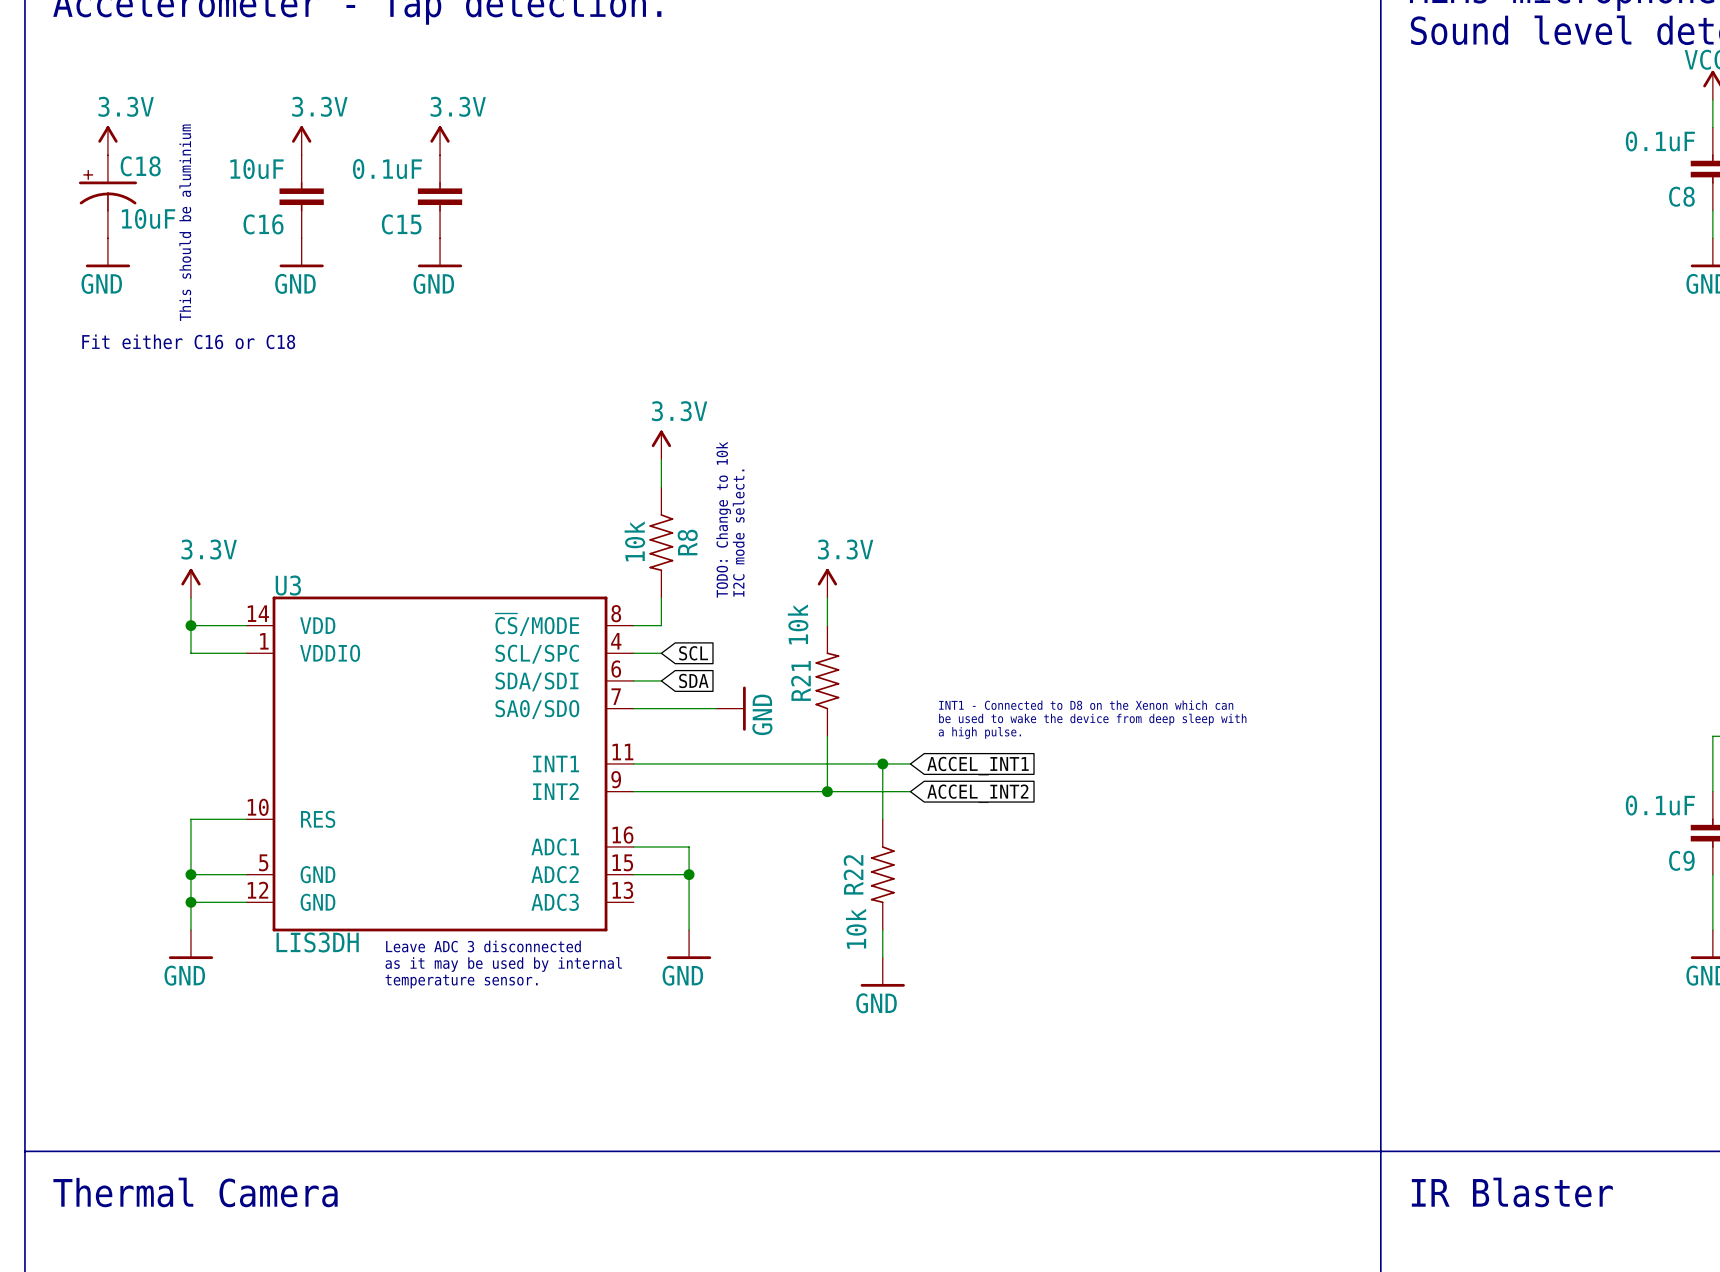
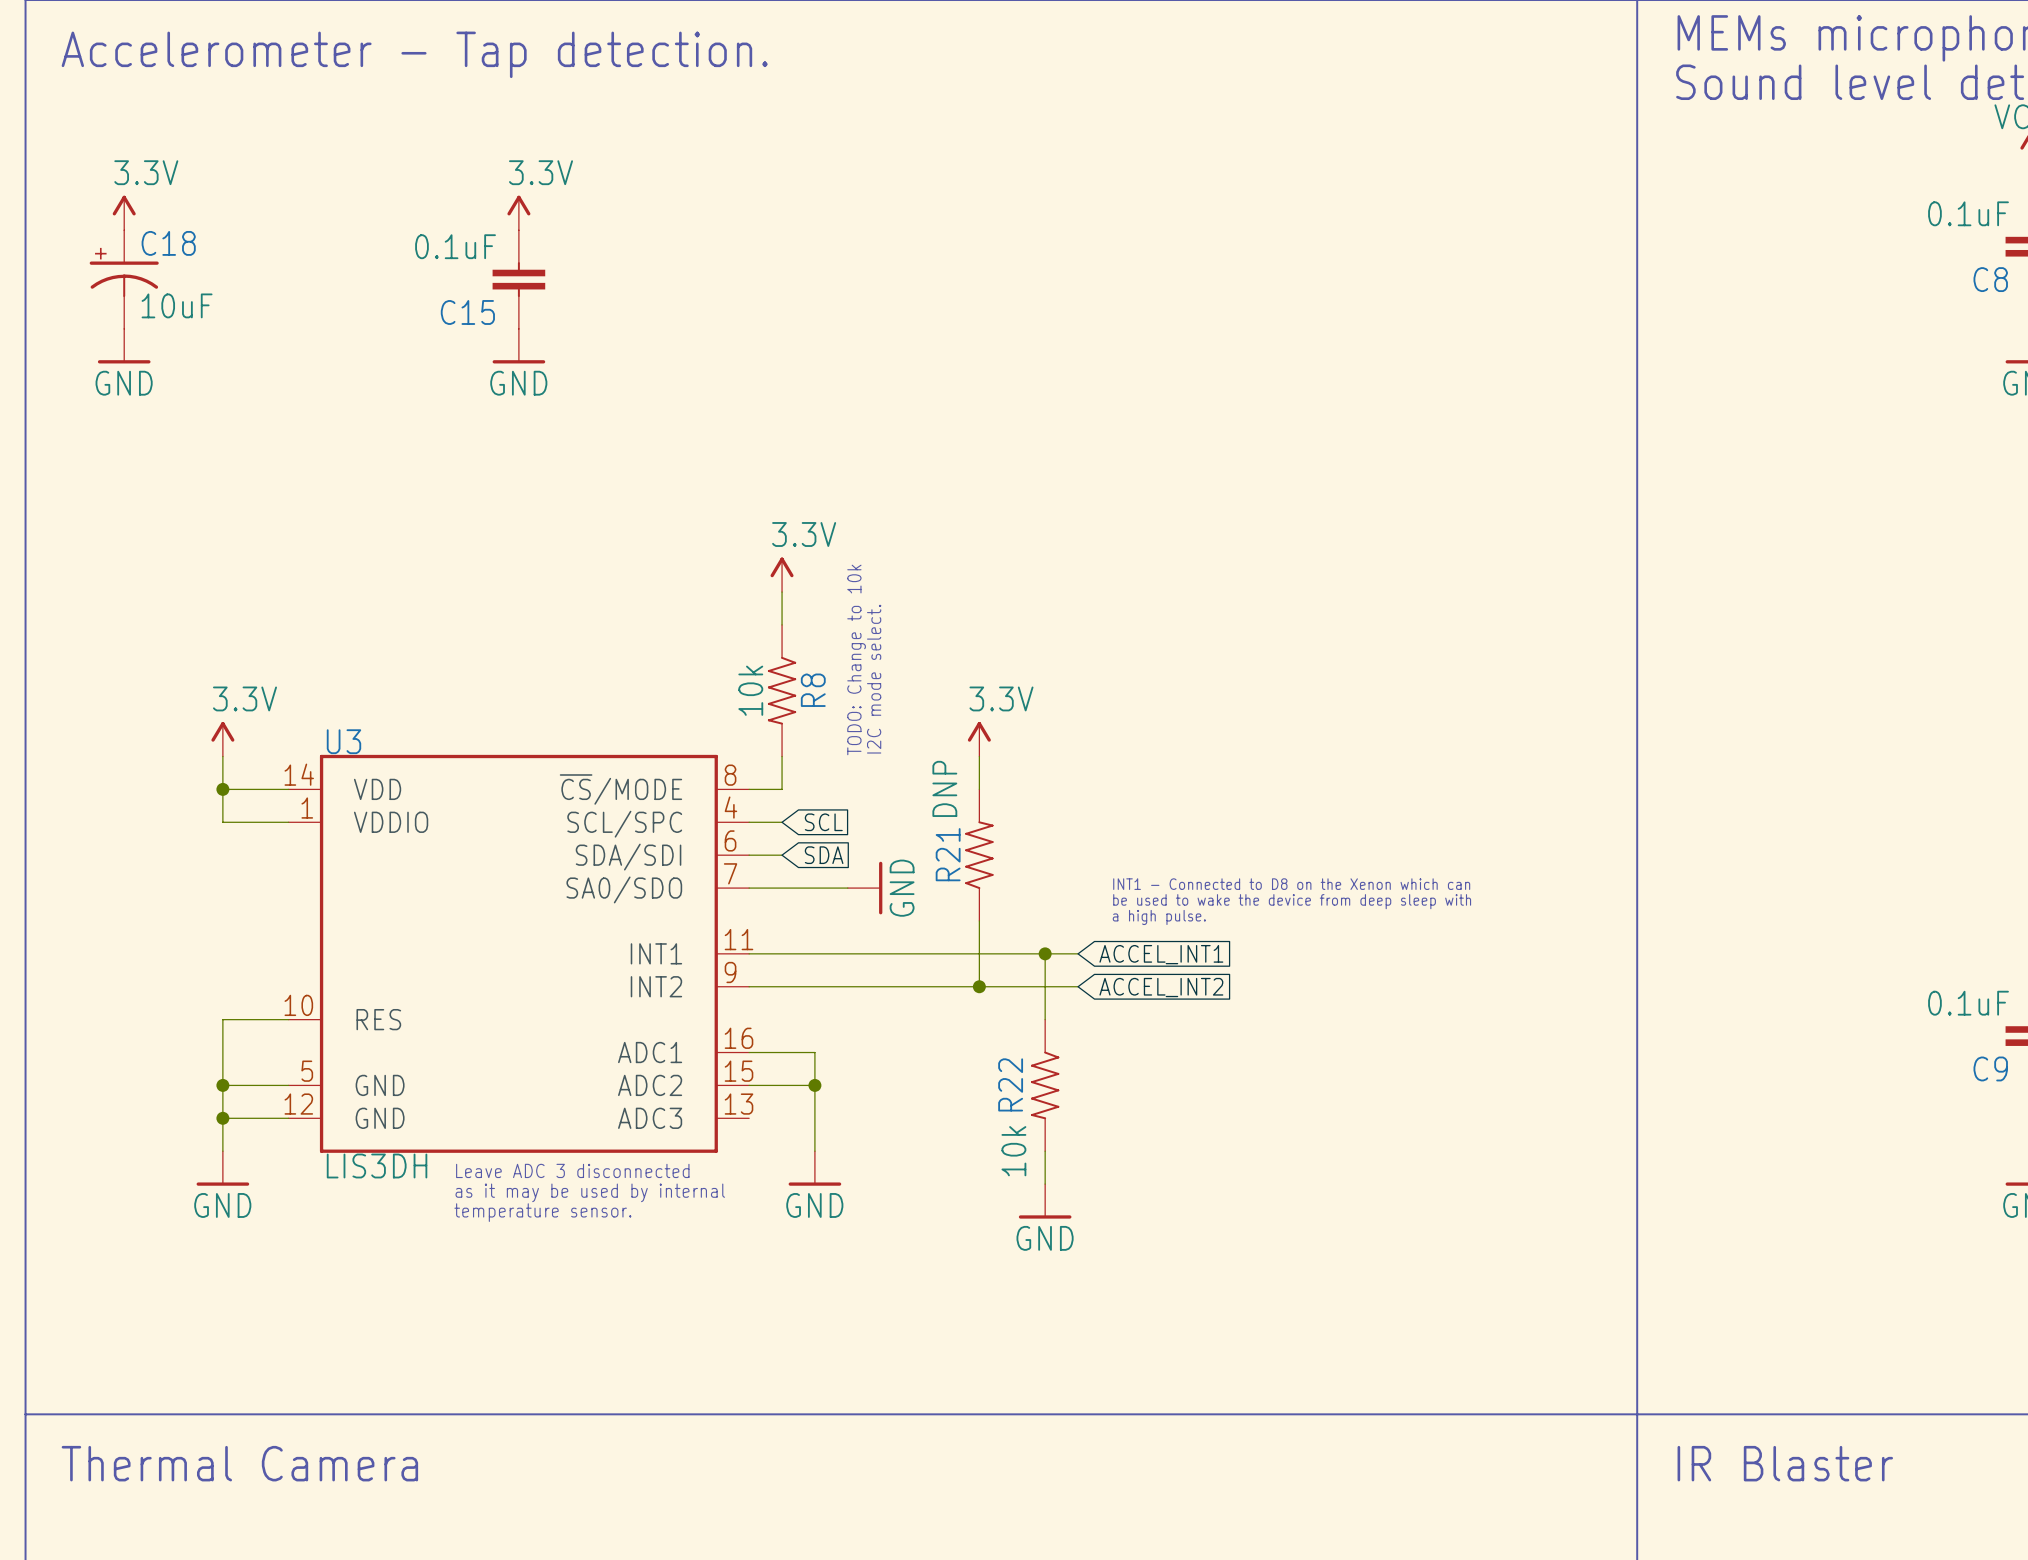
power symbol: 3.3V (301, 140) -> none
C16: 10uF (301, 196) -> none
text: This should be aluminium (185, 222) -> none
power symbol: GND (301, 252) -> none
text: Fit either C16 or C18 (188, 341) -> none
R21 value: 10k (798, 624) -> DNP (944, 788)

